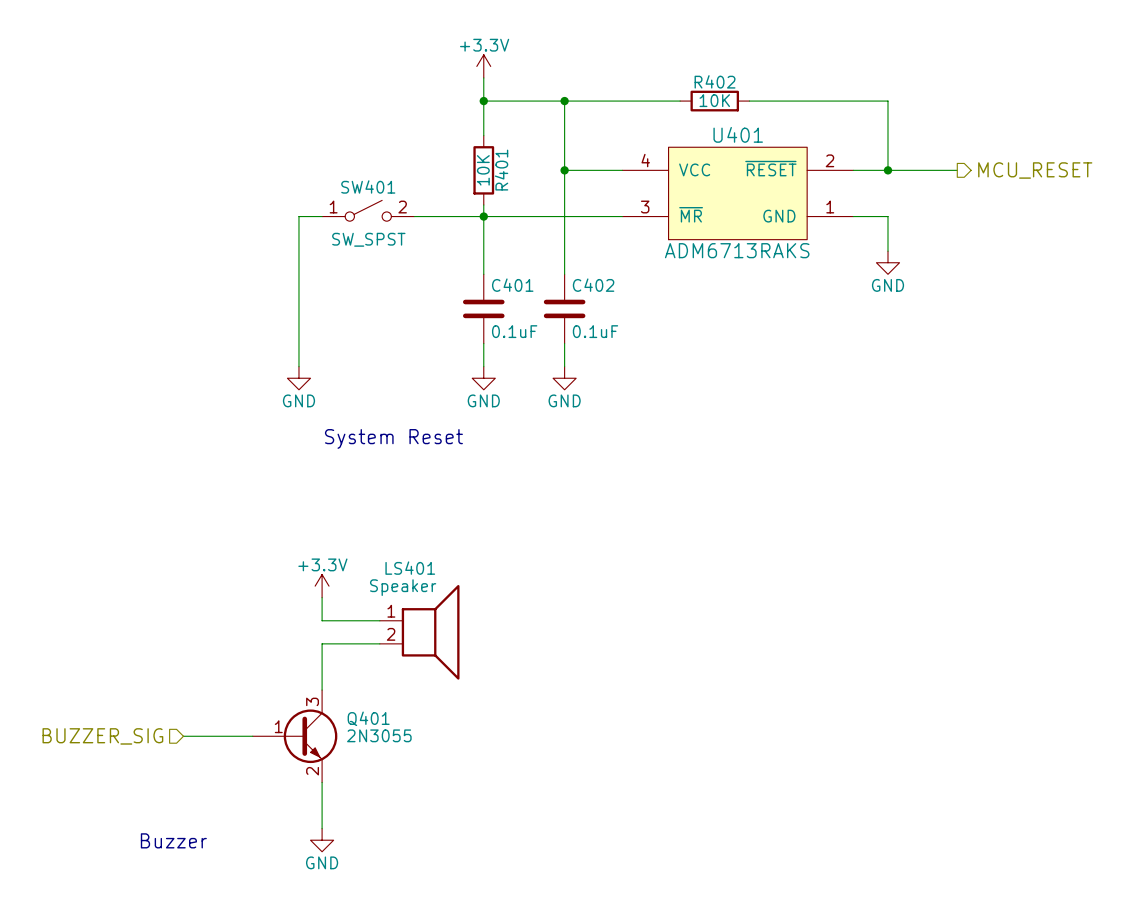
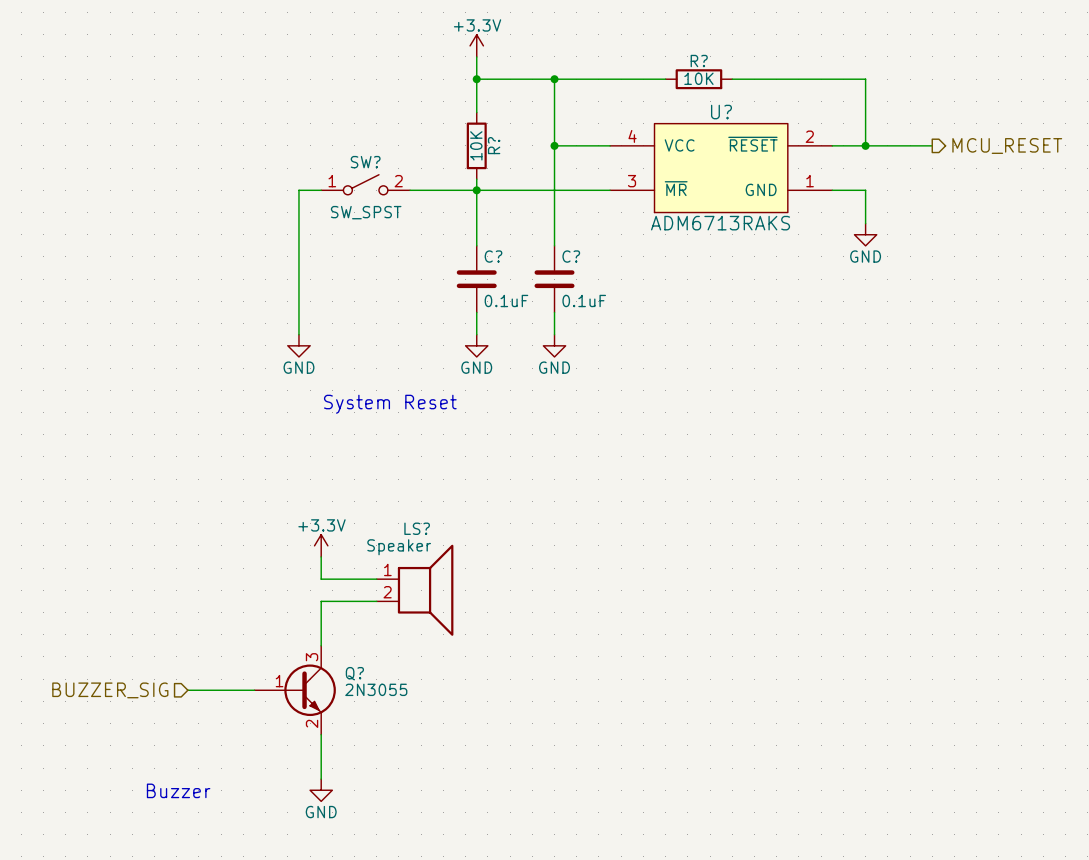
R402 name: R402 (715, 81) -> R? (699, 61)
U401 name: U401 (738, 134) -> U? (721, 112)
R401 name: R401 (501, 170) -> R? (494, 145)
SW401 name: SW401 (368, 186) -> SW? (365, 162)
C401 name: C401 (512, 285) -> C? (493, 256)
C402 name: C402 (593, 285) -> C? (571, 256)
LS401 name: LS401 (410, 568) -> LS? (417, 528)
Q401 name: Q401 (368, 718) -> Q? (354, 673)

